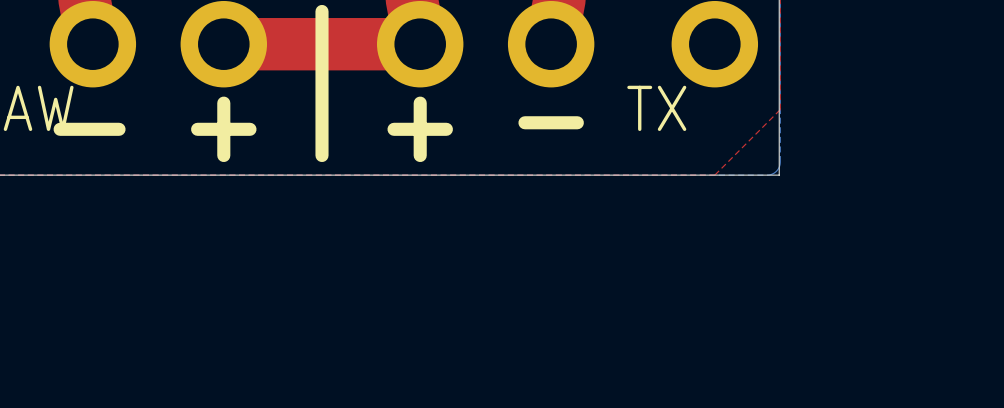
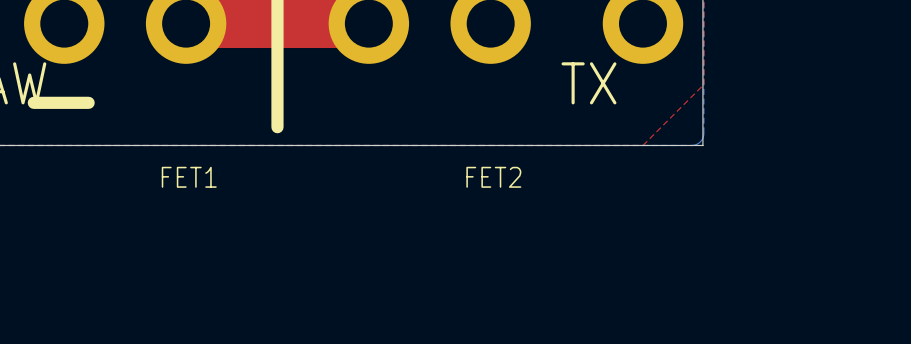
line: (223, 103) (223, 155) -> none
line: (420, 103) (420, 155) -> none
line: (524, 122) (577, 122) -> none
line: (197, 129) (249, 129) -> none
line: (394, 129) (446, 129) -> none
FET1 name: none -> FET1 (189, 177)
FET2 name: none -> FET2 (493, 177)

